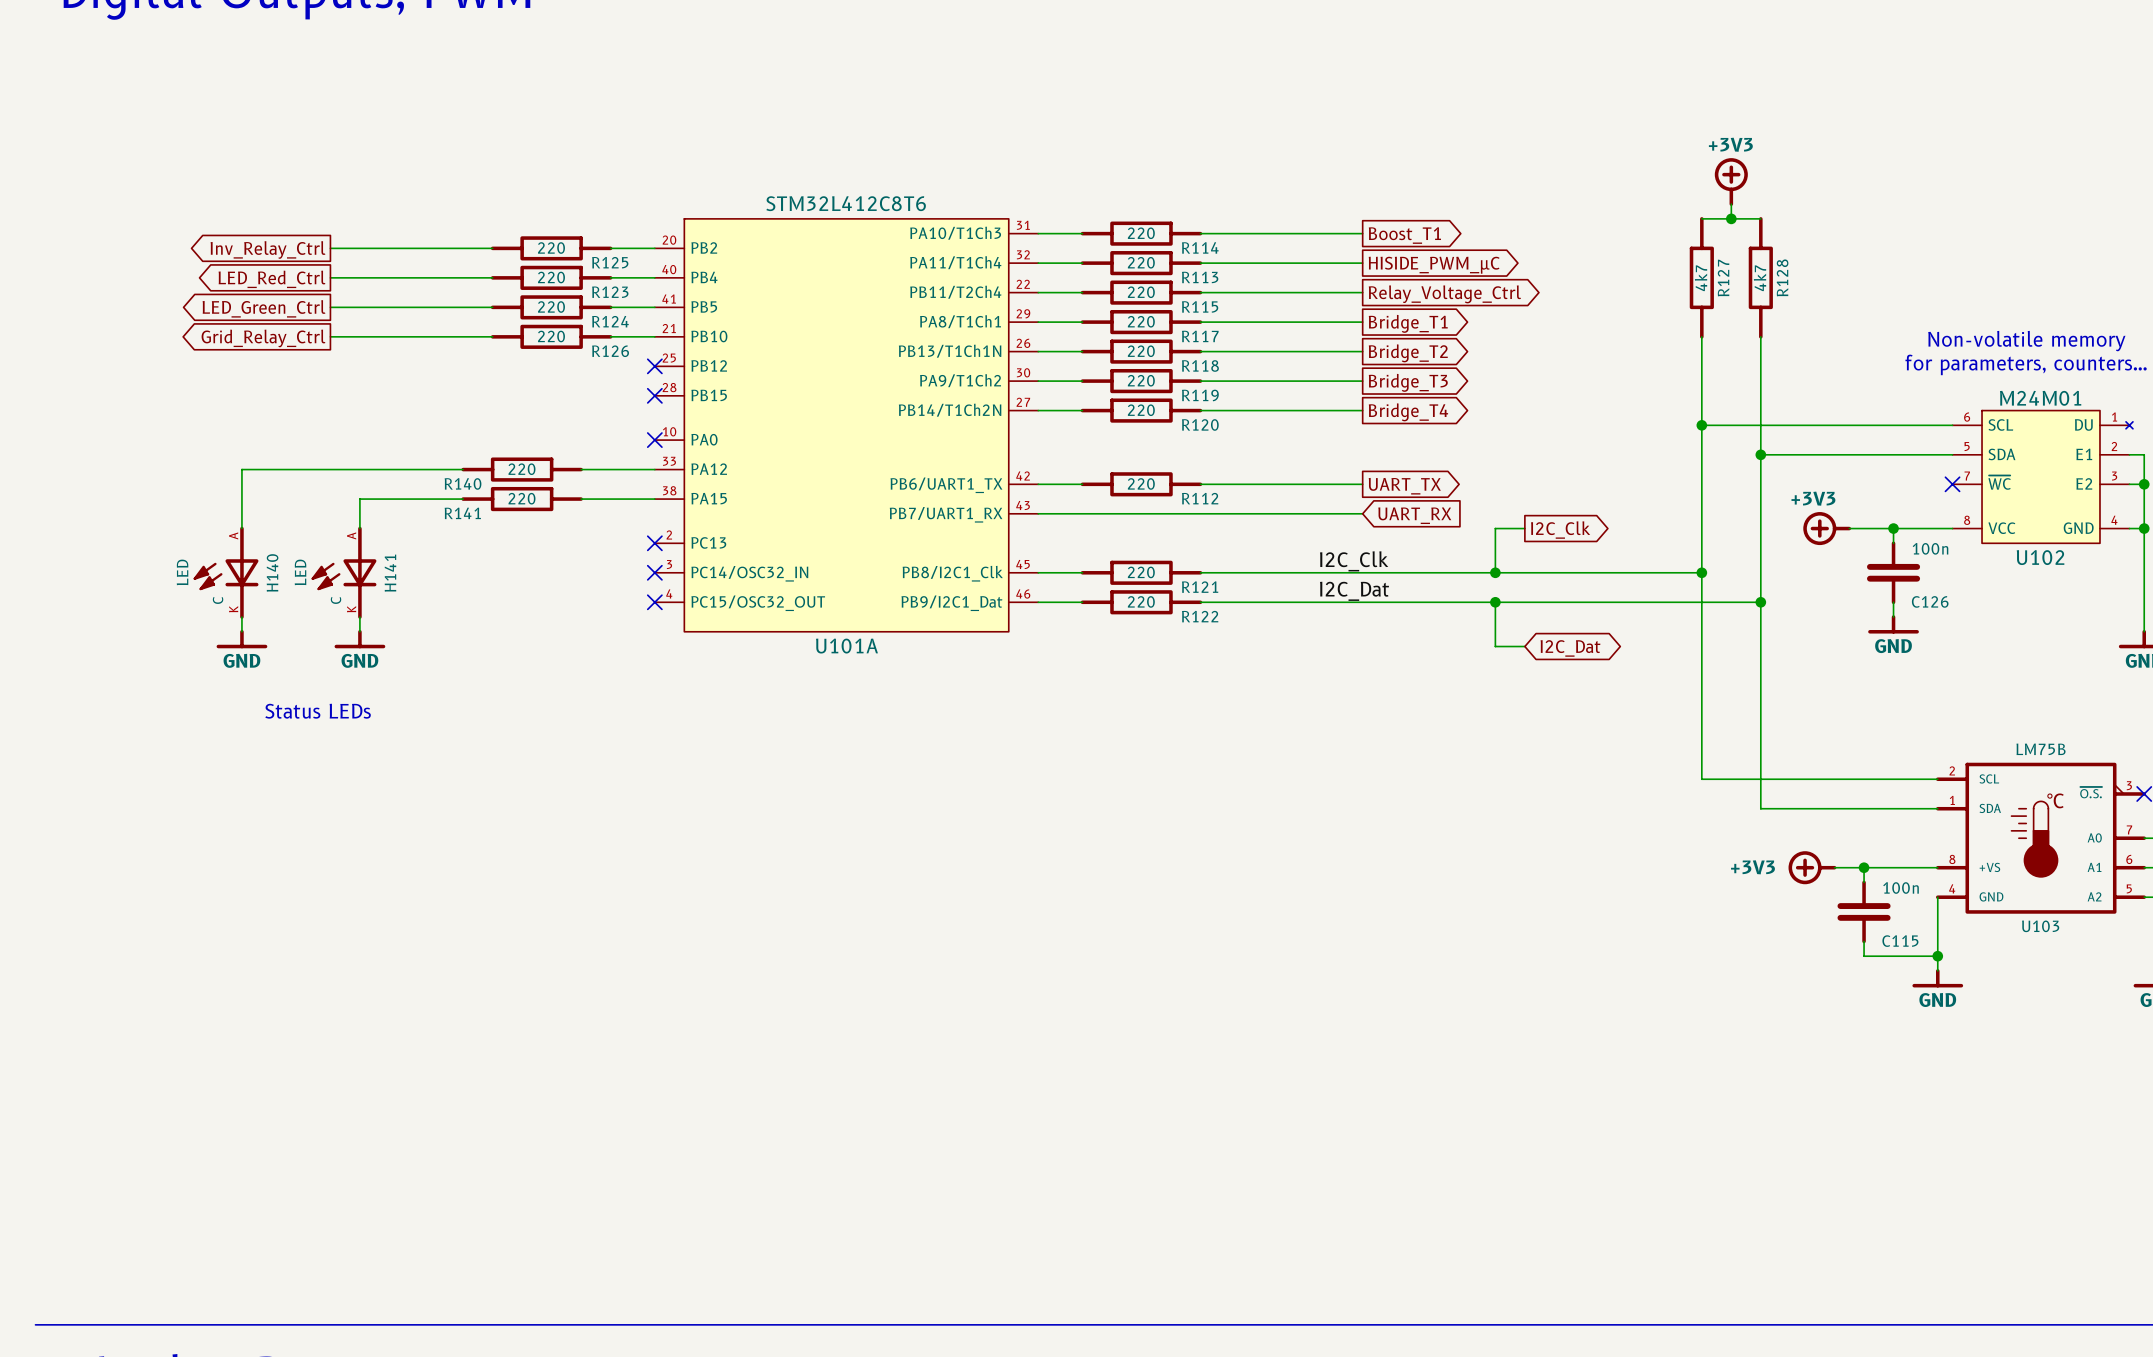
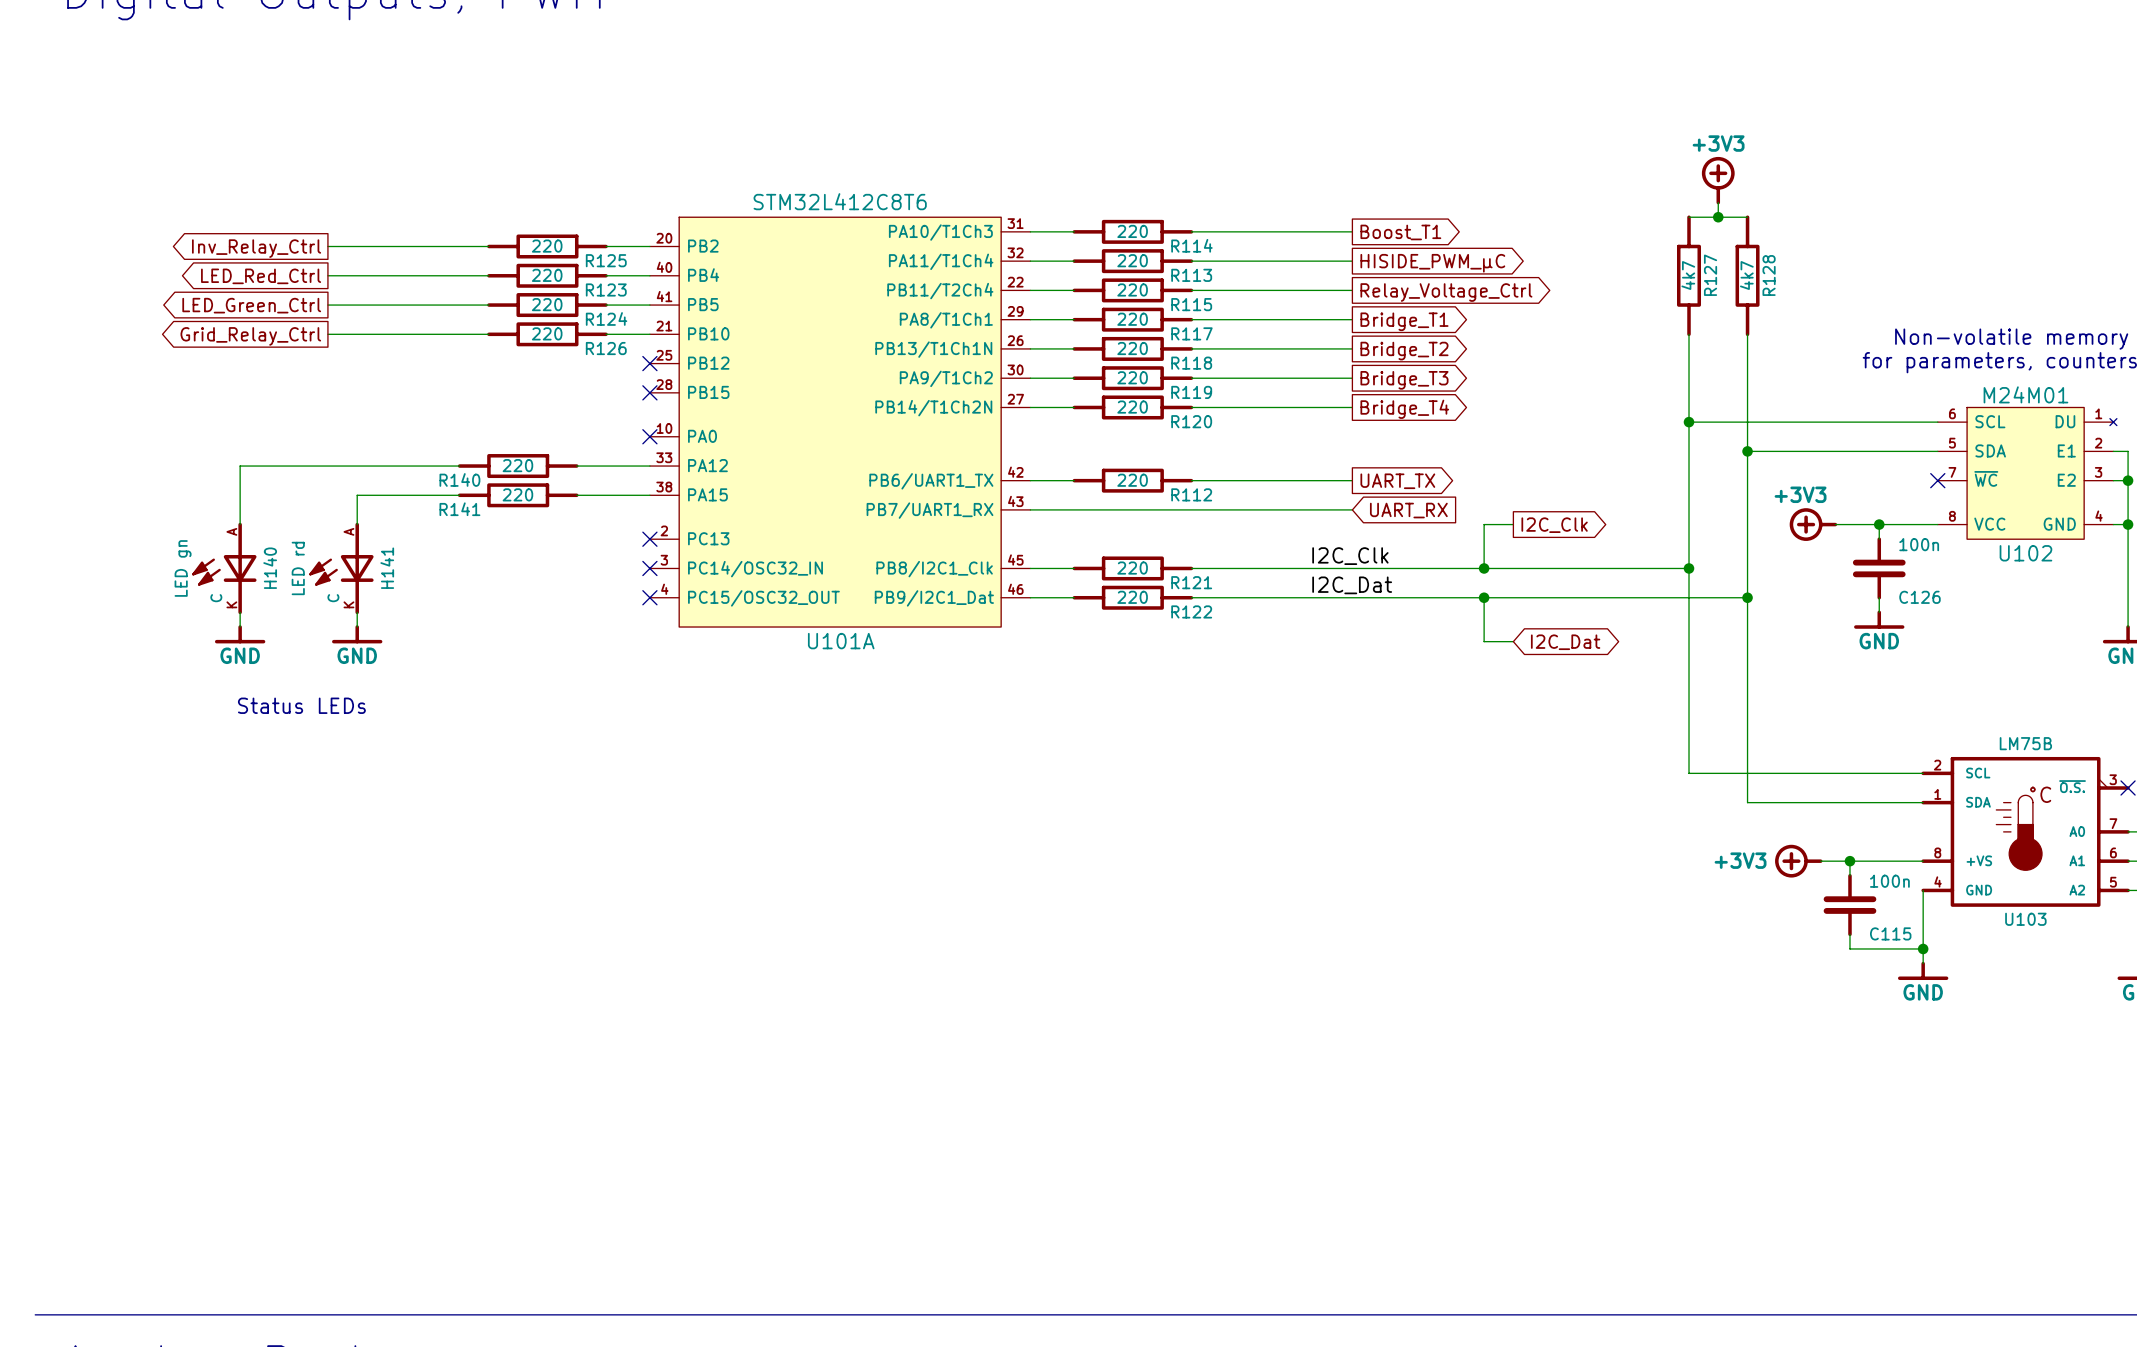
H140 value: LED (182, 572) -> LED gn (183, 568)
H141 value: LED (300, 572) -> LED rd (298, 568)

